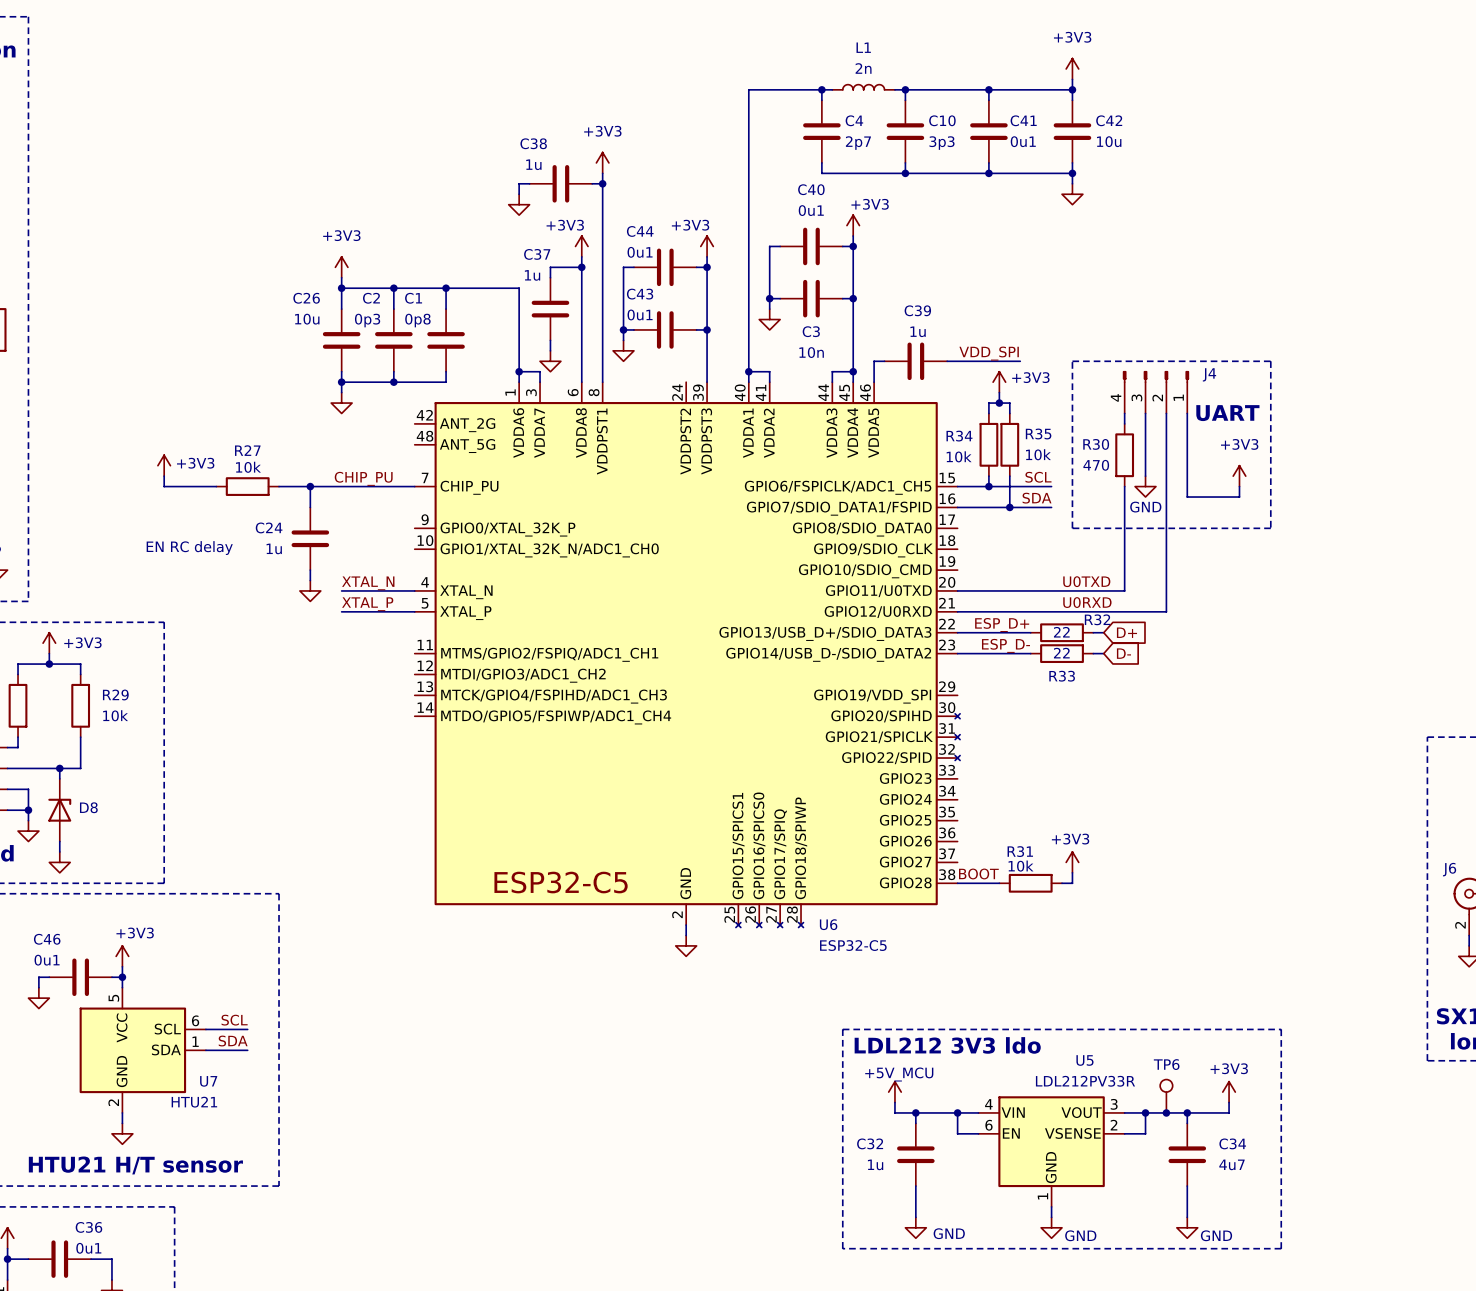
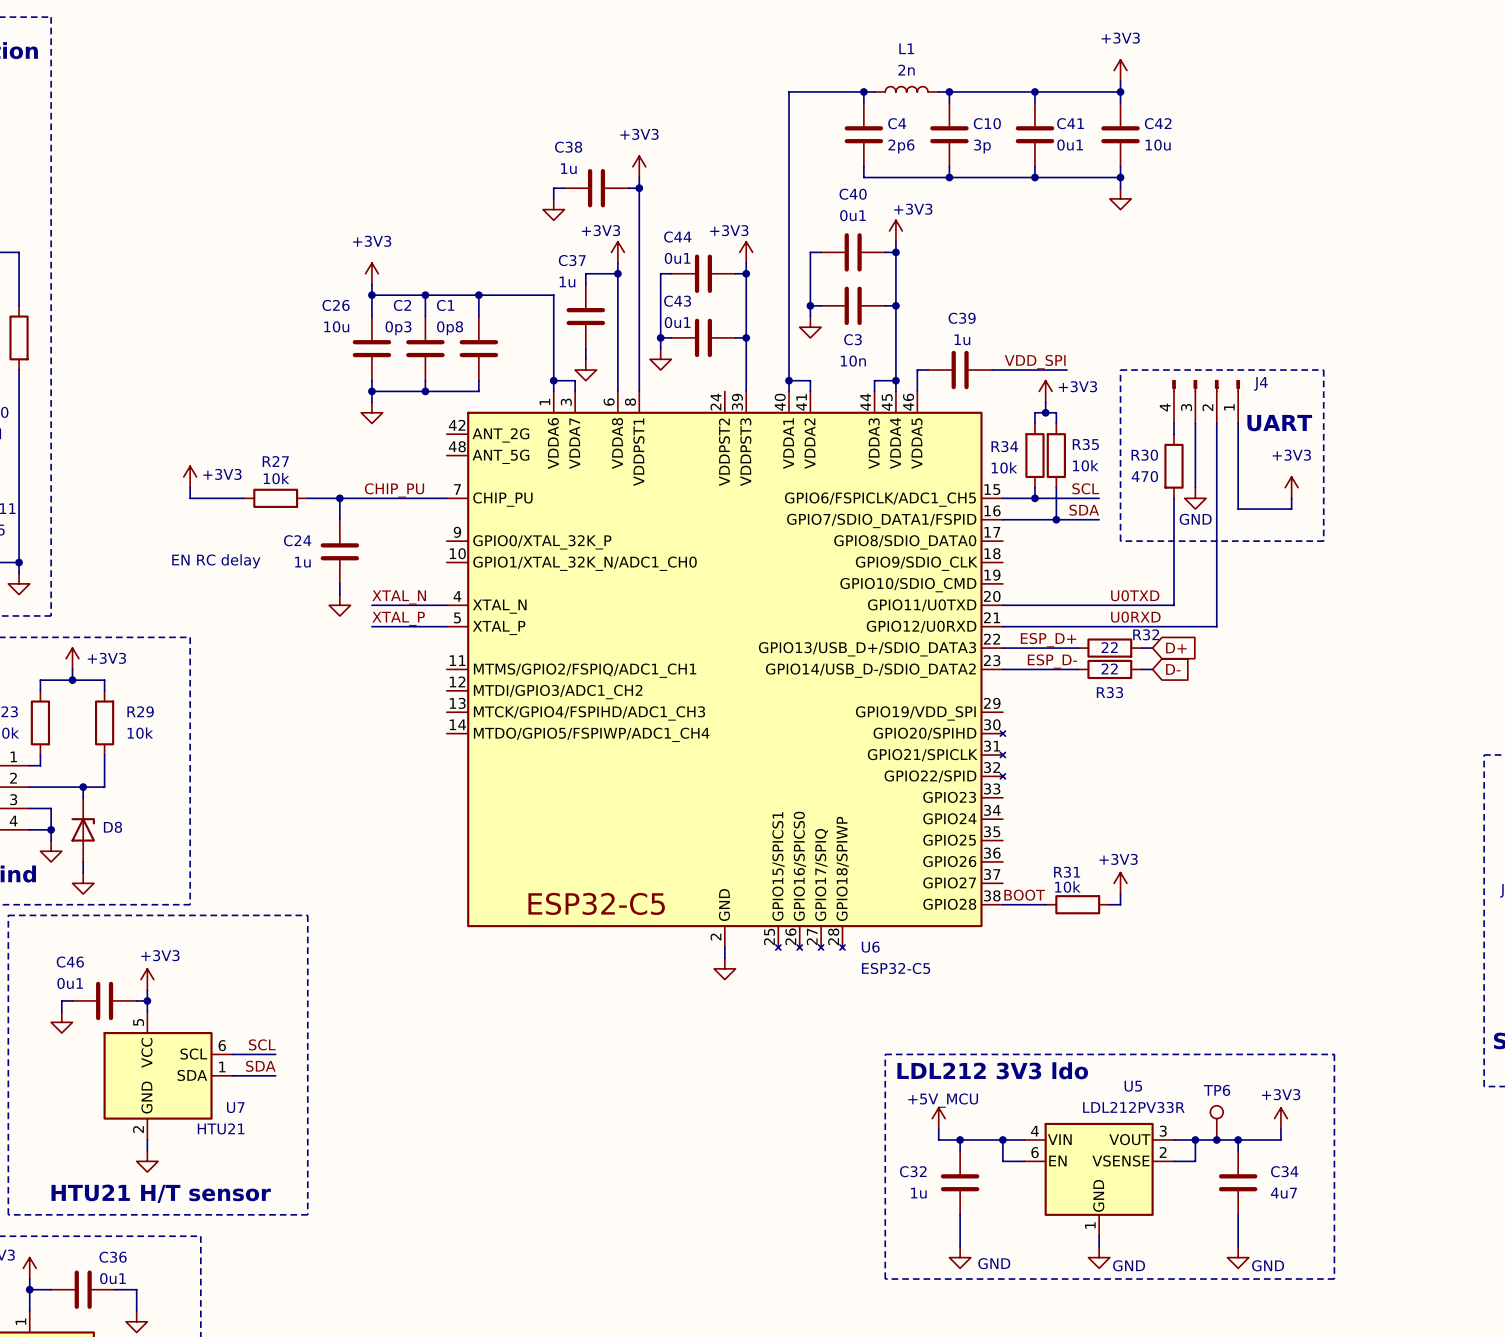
C4 value: 2p7 (858, 143) -> 2p6 (901, 146)
C10 value: 3p3 (942, 143) -> 3p (982, 146)

